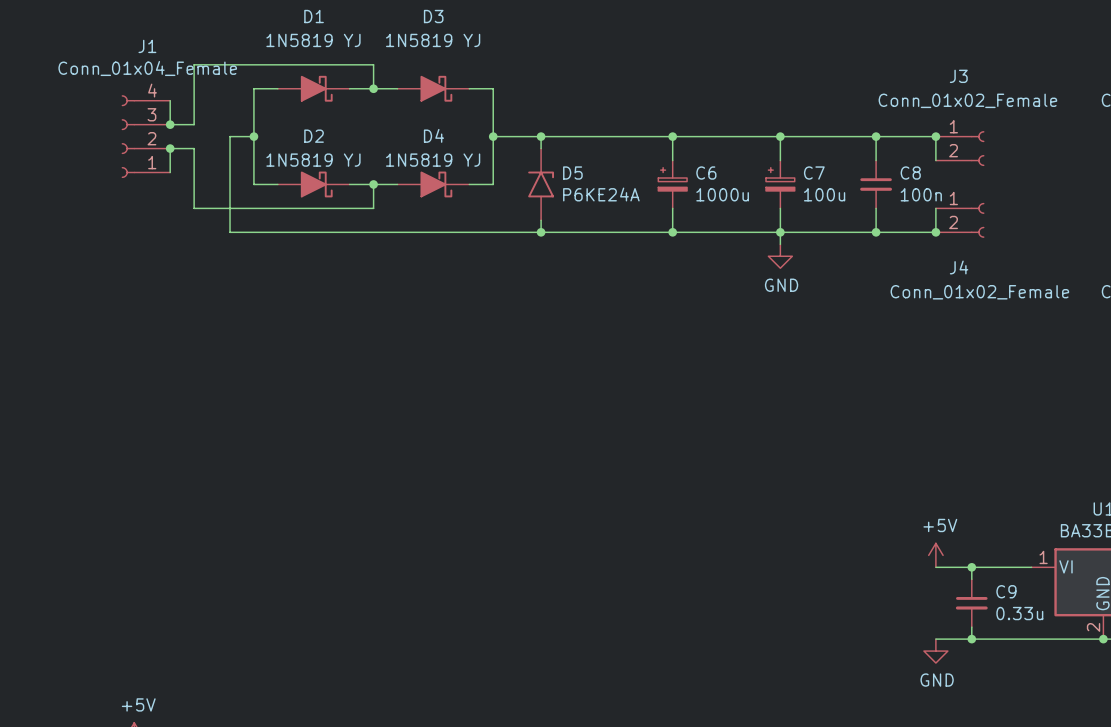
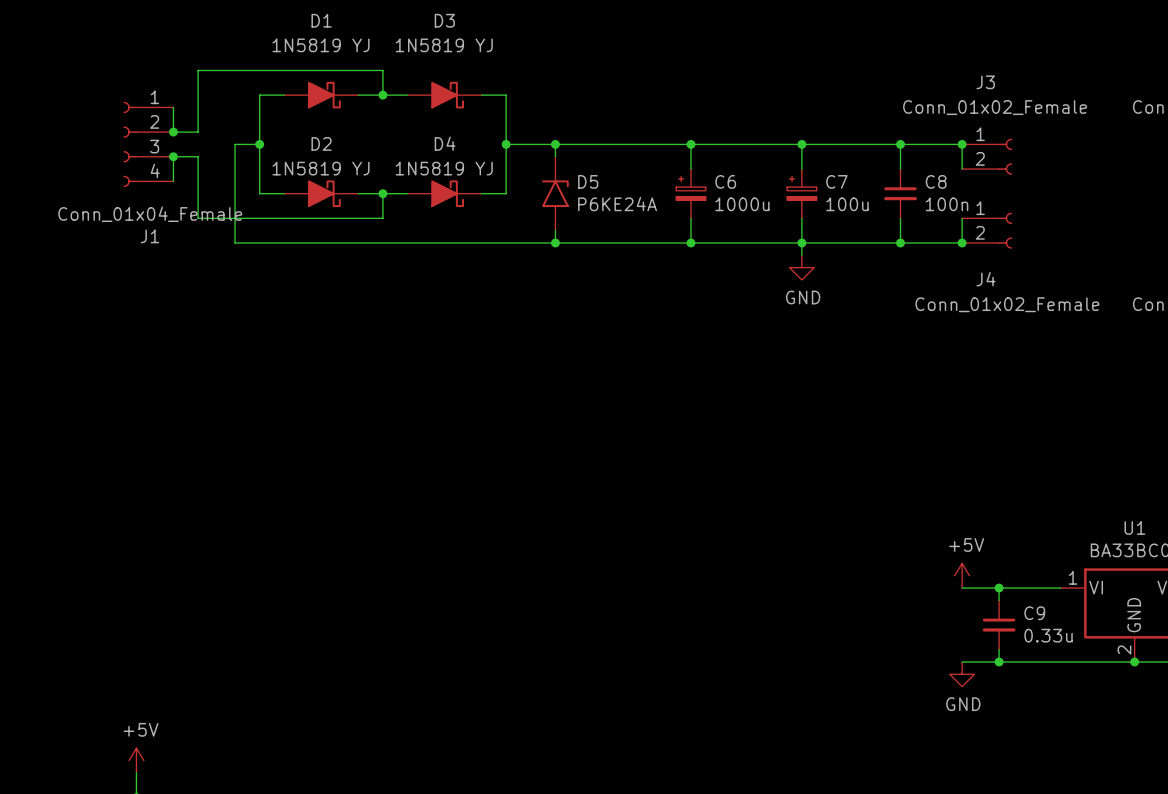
J1 flip: as is (128, 136) -> up-down (130, 144)

